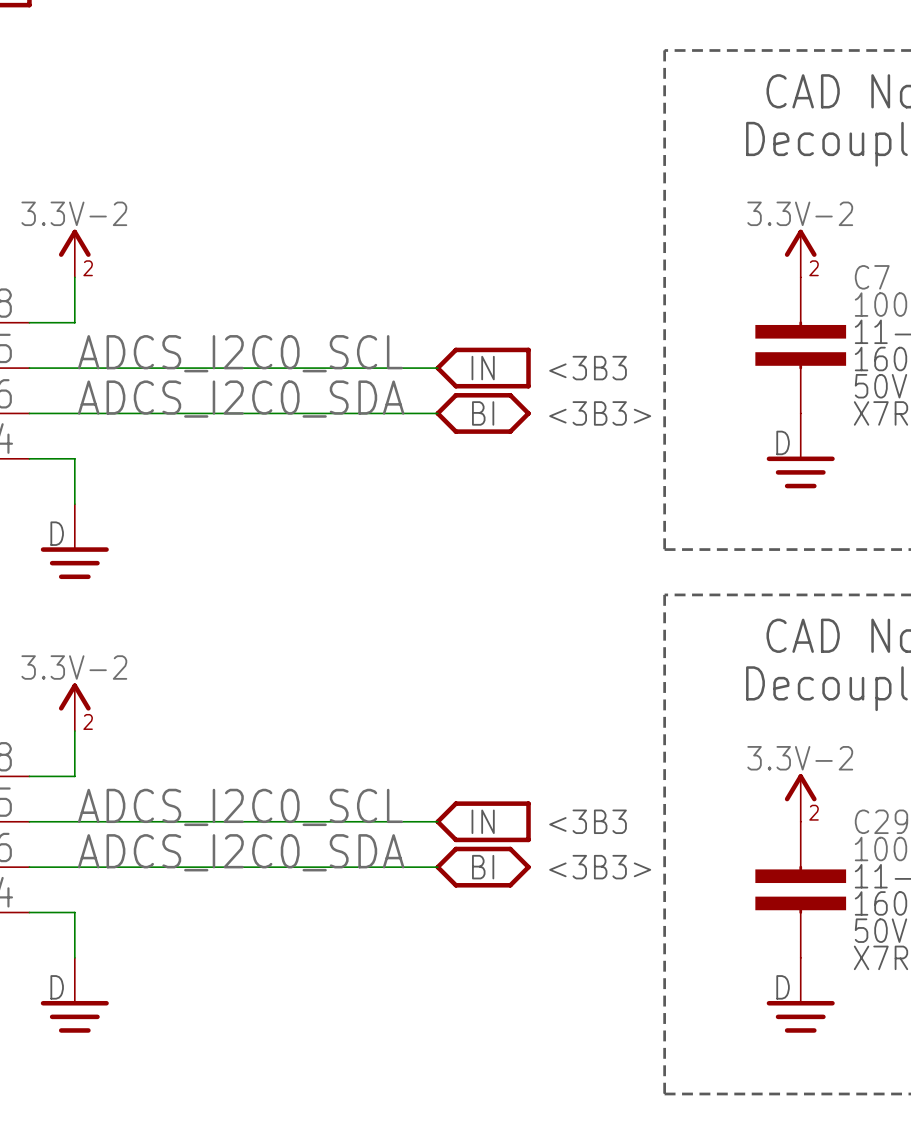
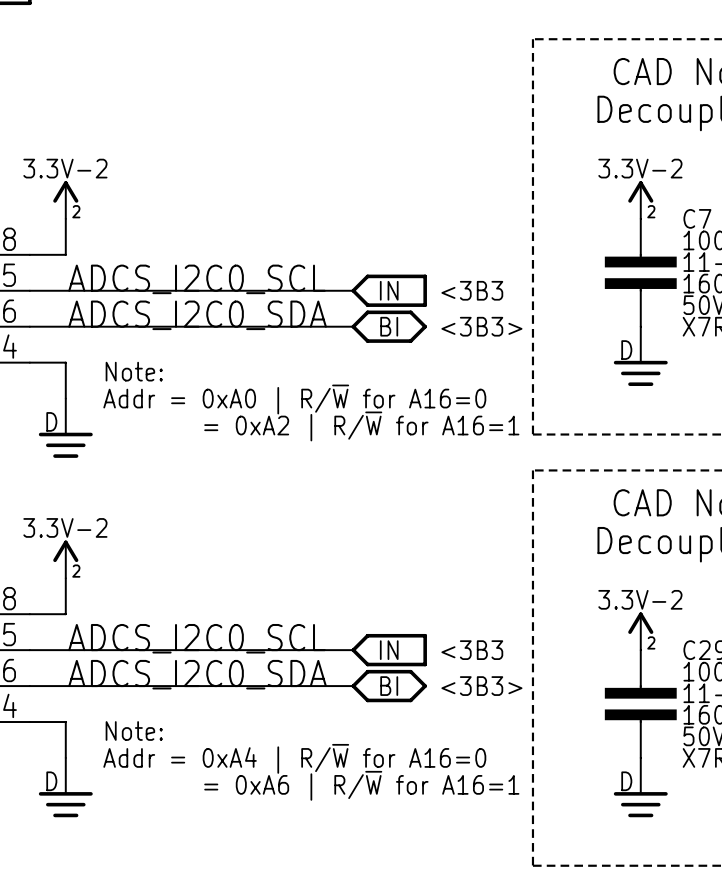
text: none -> Note: (134, 371)
text: none -> Addr = 0xA0 | R/~{W} for A16=0 (294, 399)
text: none -> = 0xA2 | R/~{W} for A16=1 (361, 426)
text: none -> Note: (134, 730)
text: none -> Addr = 0xA4 | R/~{W} for A16=0 (294, 758)
text: none -> = 0xA6 | R/~{W} for A16=1 (361, 785)

